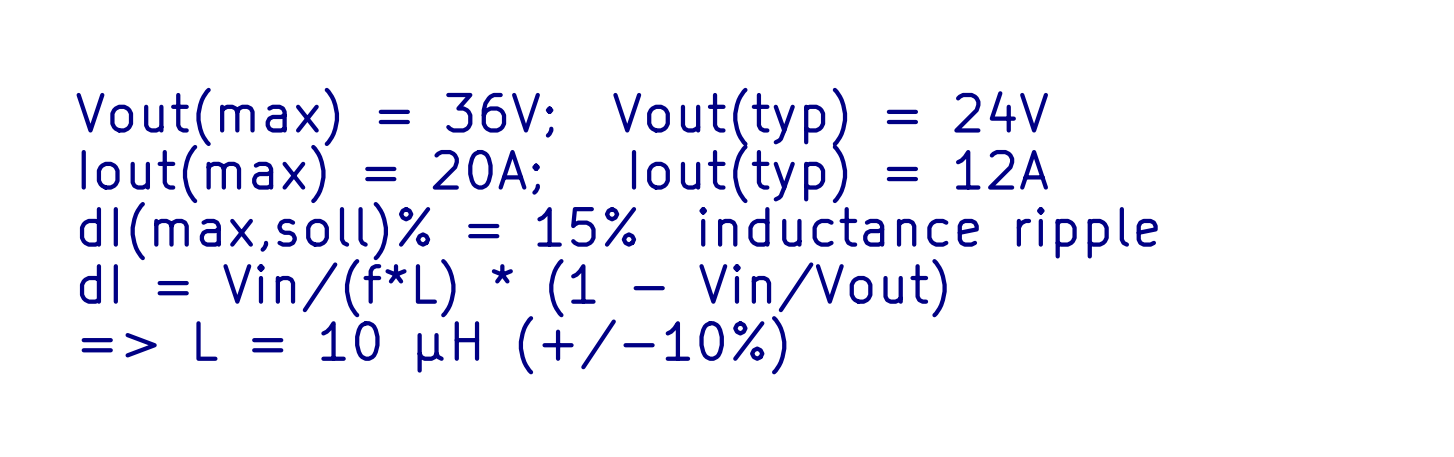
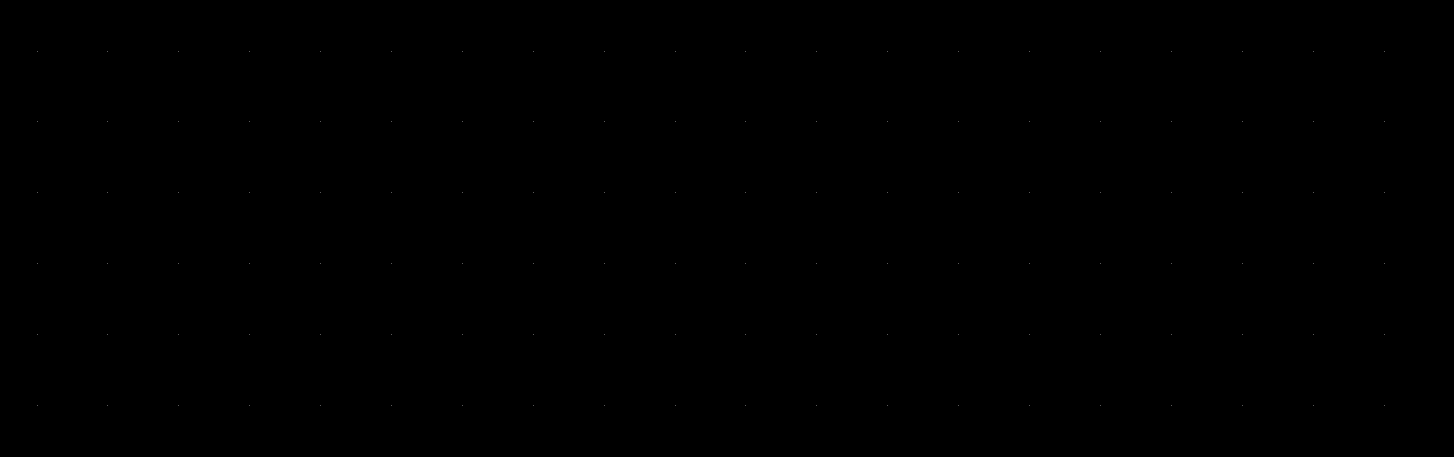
text: Vout(max) = 36V; Vout(typ) = 24V (562, 116) -> none
text: Iout(max) = 20A; Iout(typ) = 12A (564, 174) -> none
text: dI(max,soll)% = 15% inductance ripple (618, 231) -> none
text: dI = Vin/(f*L) * (1 - Vin/Vout) (513, 288) -> none
text: => L = 10 µH (+/-10%) (433, 345) -> none

